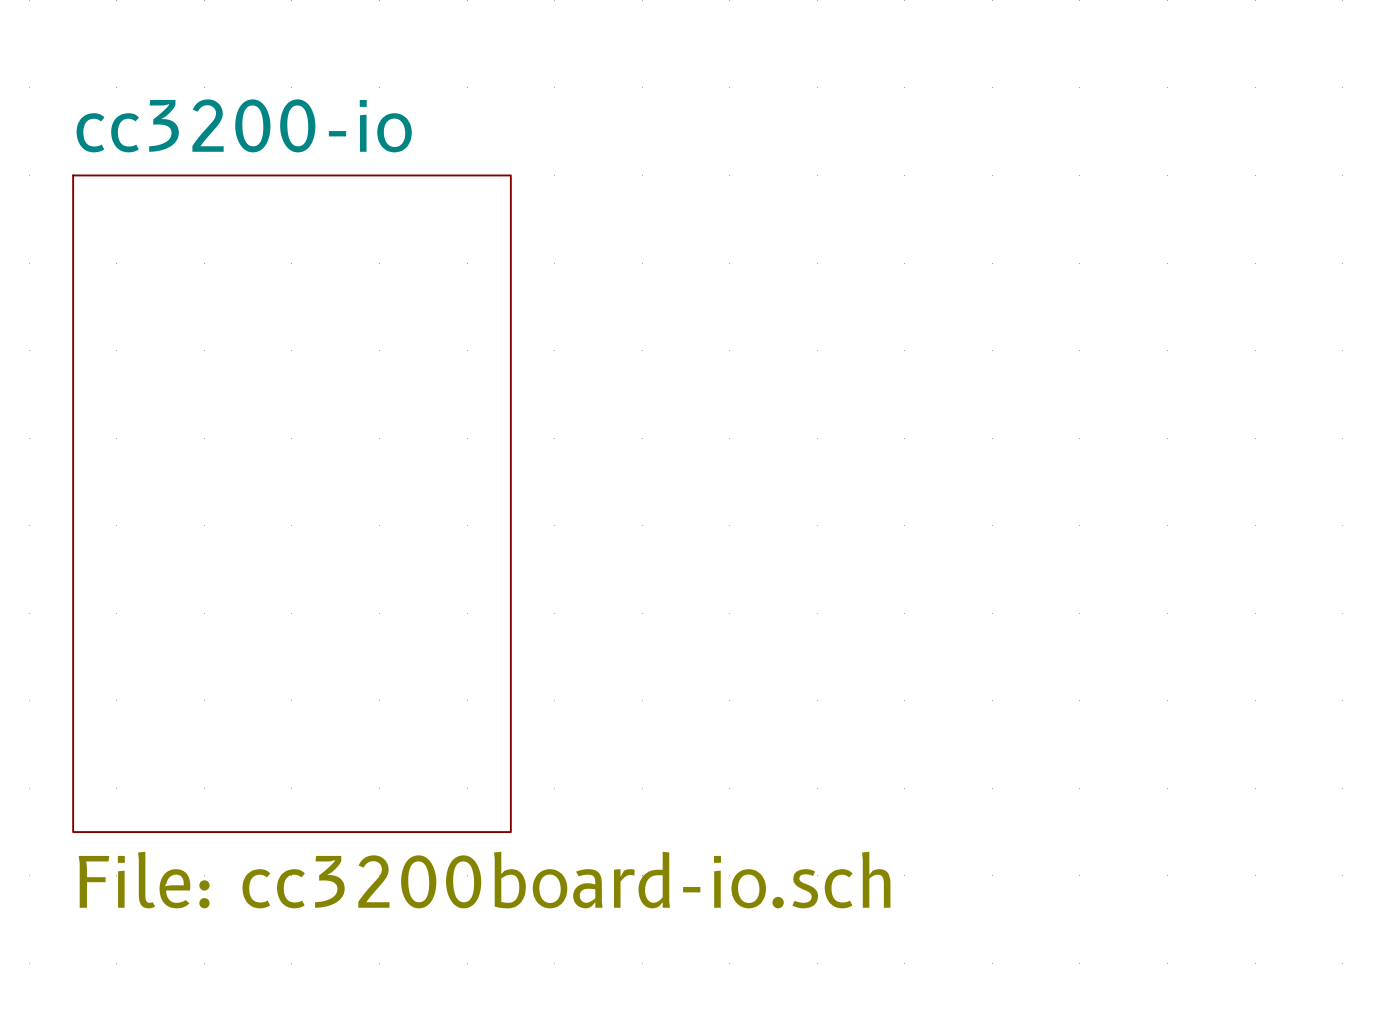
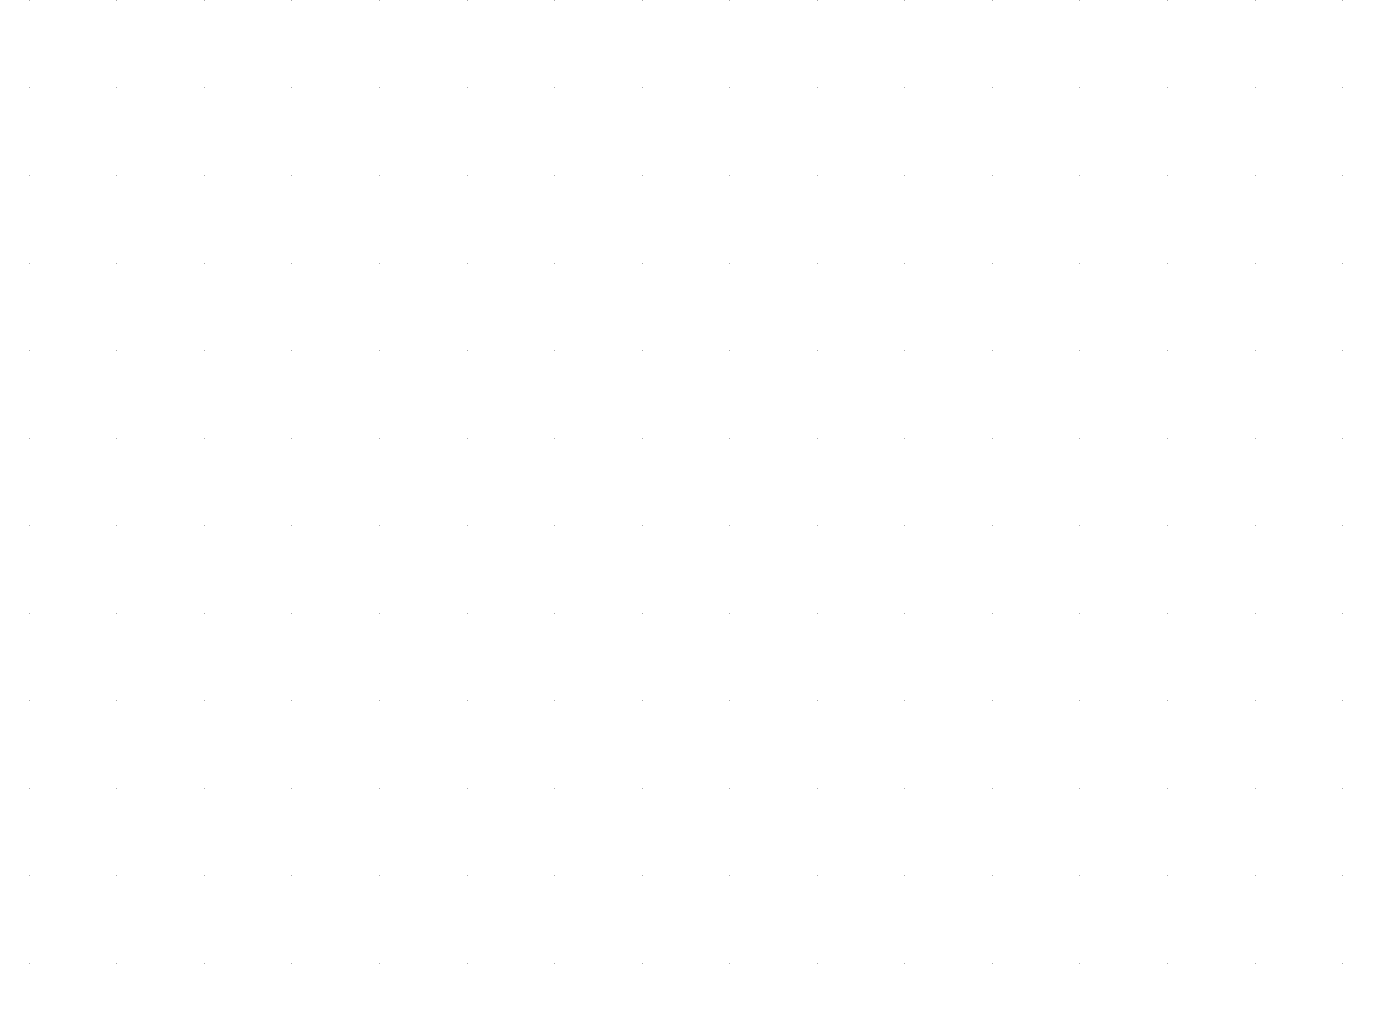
sheet cc3200-io: File: cc3200board-io.sch (291, 503) -> none

